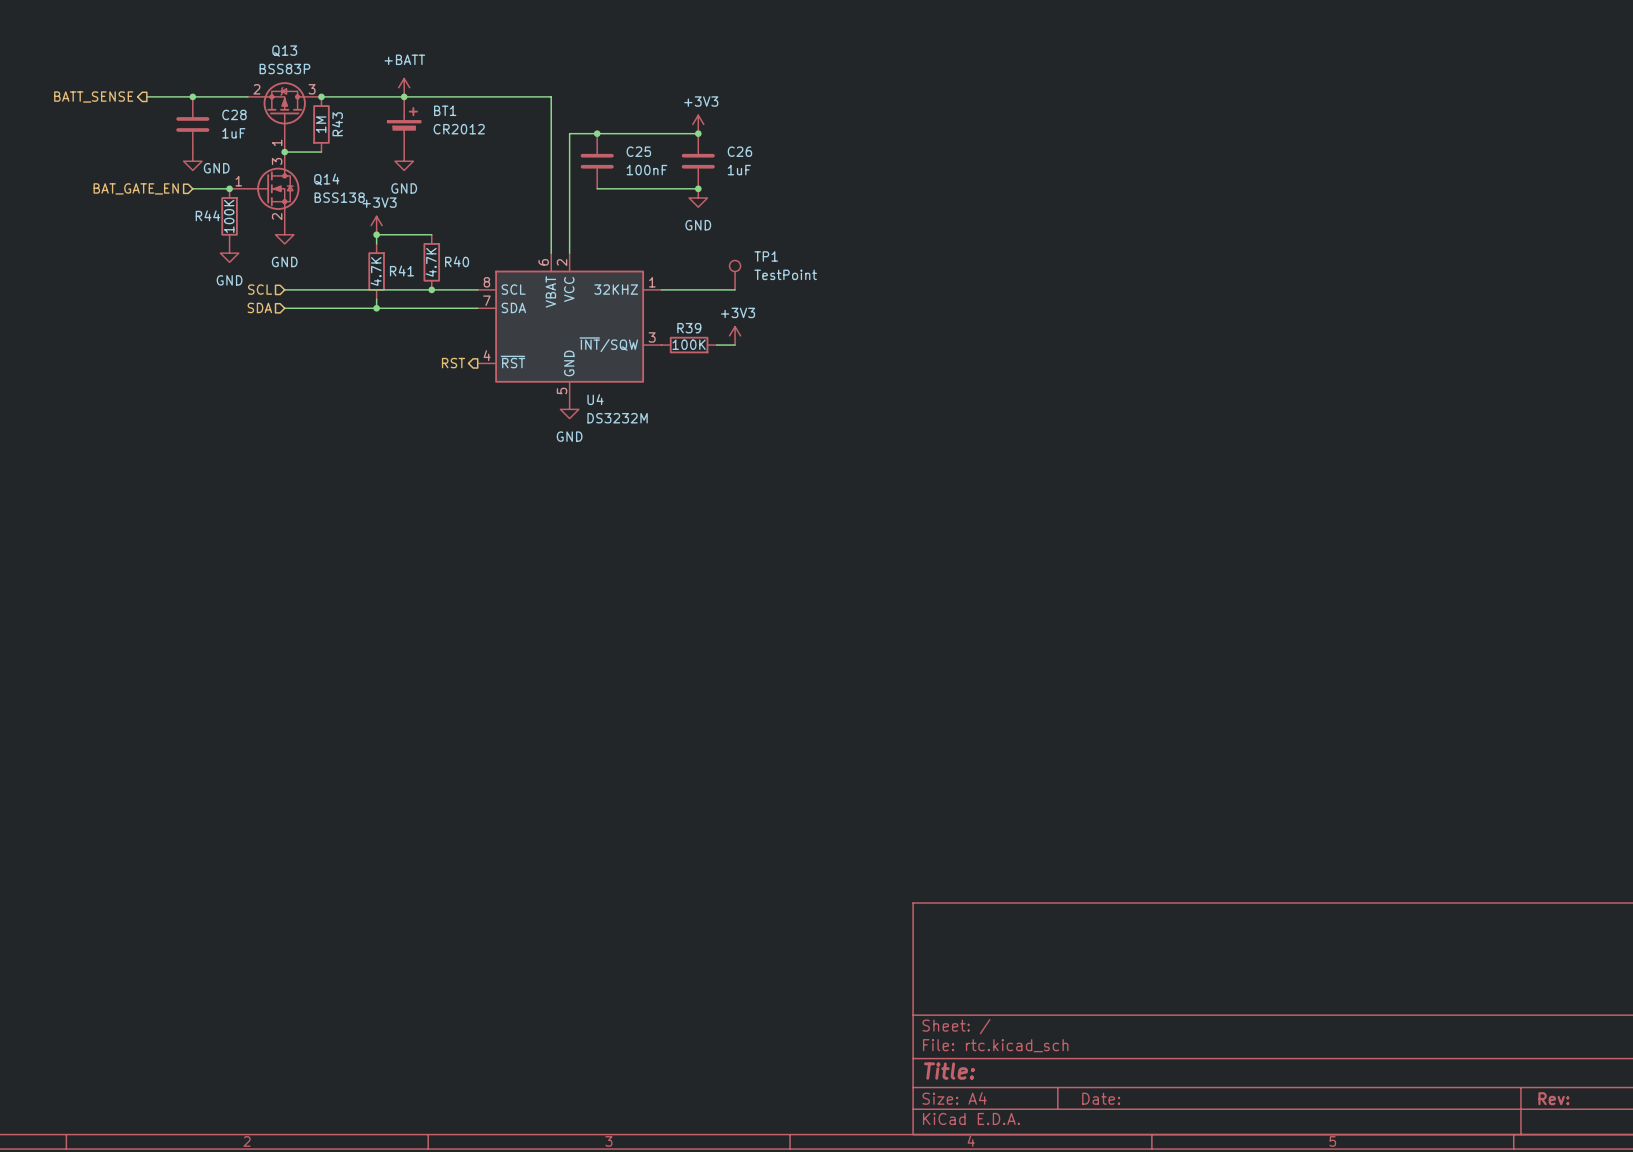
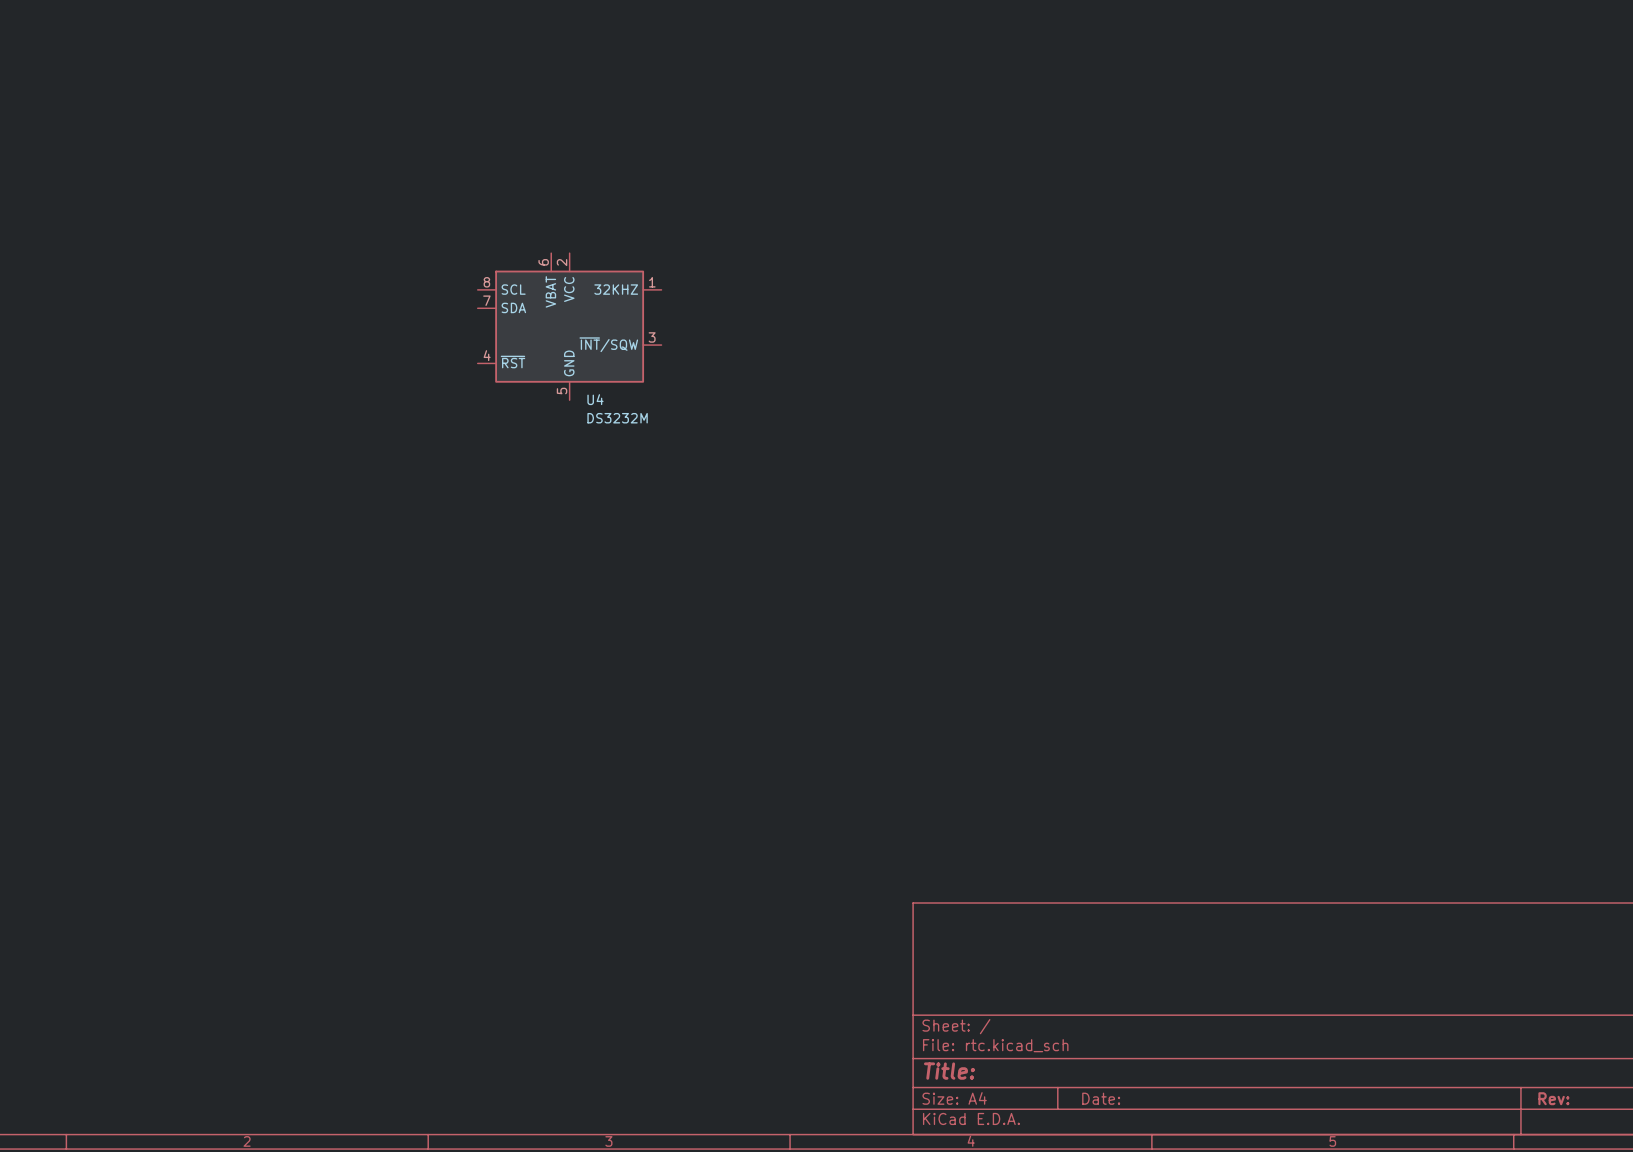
power symbol: +BATT (404, 87) -> none
hierarchical label: BATT_SENSE (93, 96) -> none
wire: (146, 96) (247, 96) -> none
junction: (192, 96) -> none
wire: (321, 96) (551, 96) (551, 253) -> none
junction: (321, 96) -> none
junction: (404, 96) -> none
Q13: BSS83P (284, 117) -> none
C28: 1uF (192, 124) -> none
R43: 1M (321, 124) -> none
BT1: CR2012 (404, 124) -> none
power symbol: +3V3 (698, 124) -> none
junction: (597, 133) -> none
wire: (698, 133) (569, 133) (569, 253) -> none
junction: (698, 133) -> none
wire: (284, 152) (321, 152) -> none
junction: (284, 152) -> none
power symbol: GND (192, 161) -> none
power symbol: GND (404, 161) -> none
C25: 100nF (597, 161) -> none
C26: 1uF (698, 161) -> none
hierarchical label: BAT_GATE_EN (136, 188) -> none
wire: (192, 188) (229, 188) -> none
junction: (229, 188) -> none
Q14: BSS138 (264, 188) -> none
wire: (597, 188) (698, 188) -> none
junction: (698, 188) -> none
power symbol: GND (698, 198) -> none
R44: 100K (229, 216) -> none
power symbol: +3V3 (376, 225) -> none
power symbol: GND (284, 234) -> none
junction: (376, 234) -> none
wire: (431, 234) (376, 234) (376, 243) -> none
power symbol: GND (229, 253) -> none
R40: 4.7K (431, 262) -> none
R41: 4.7K (376, 271) -> none
TP1: TestPoint (735, 275) -> none
hierarchical label: SCL (260, 289) -> none
wire: (284, 289) (477, 289) -> none
junction: (431, 289) -> none
wire: (661, 289) (735, 289) -> none
wire: (376, 299) (376, 308) -> none
hierarchical label: SDA (259, 307) -> none
wire: (284, 308) (477, 308) -> none
junction: (376, 308) -> none
power symbol: +3V3 (735, 335) -> none
R39: 100K (689, 345) -> none
wire: (716, 345) (735, 345) -> none
hierarchical label: RST (453, 363) -> none
power symbol: GND (569, 409) -> none

